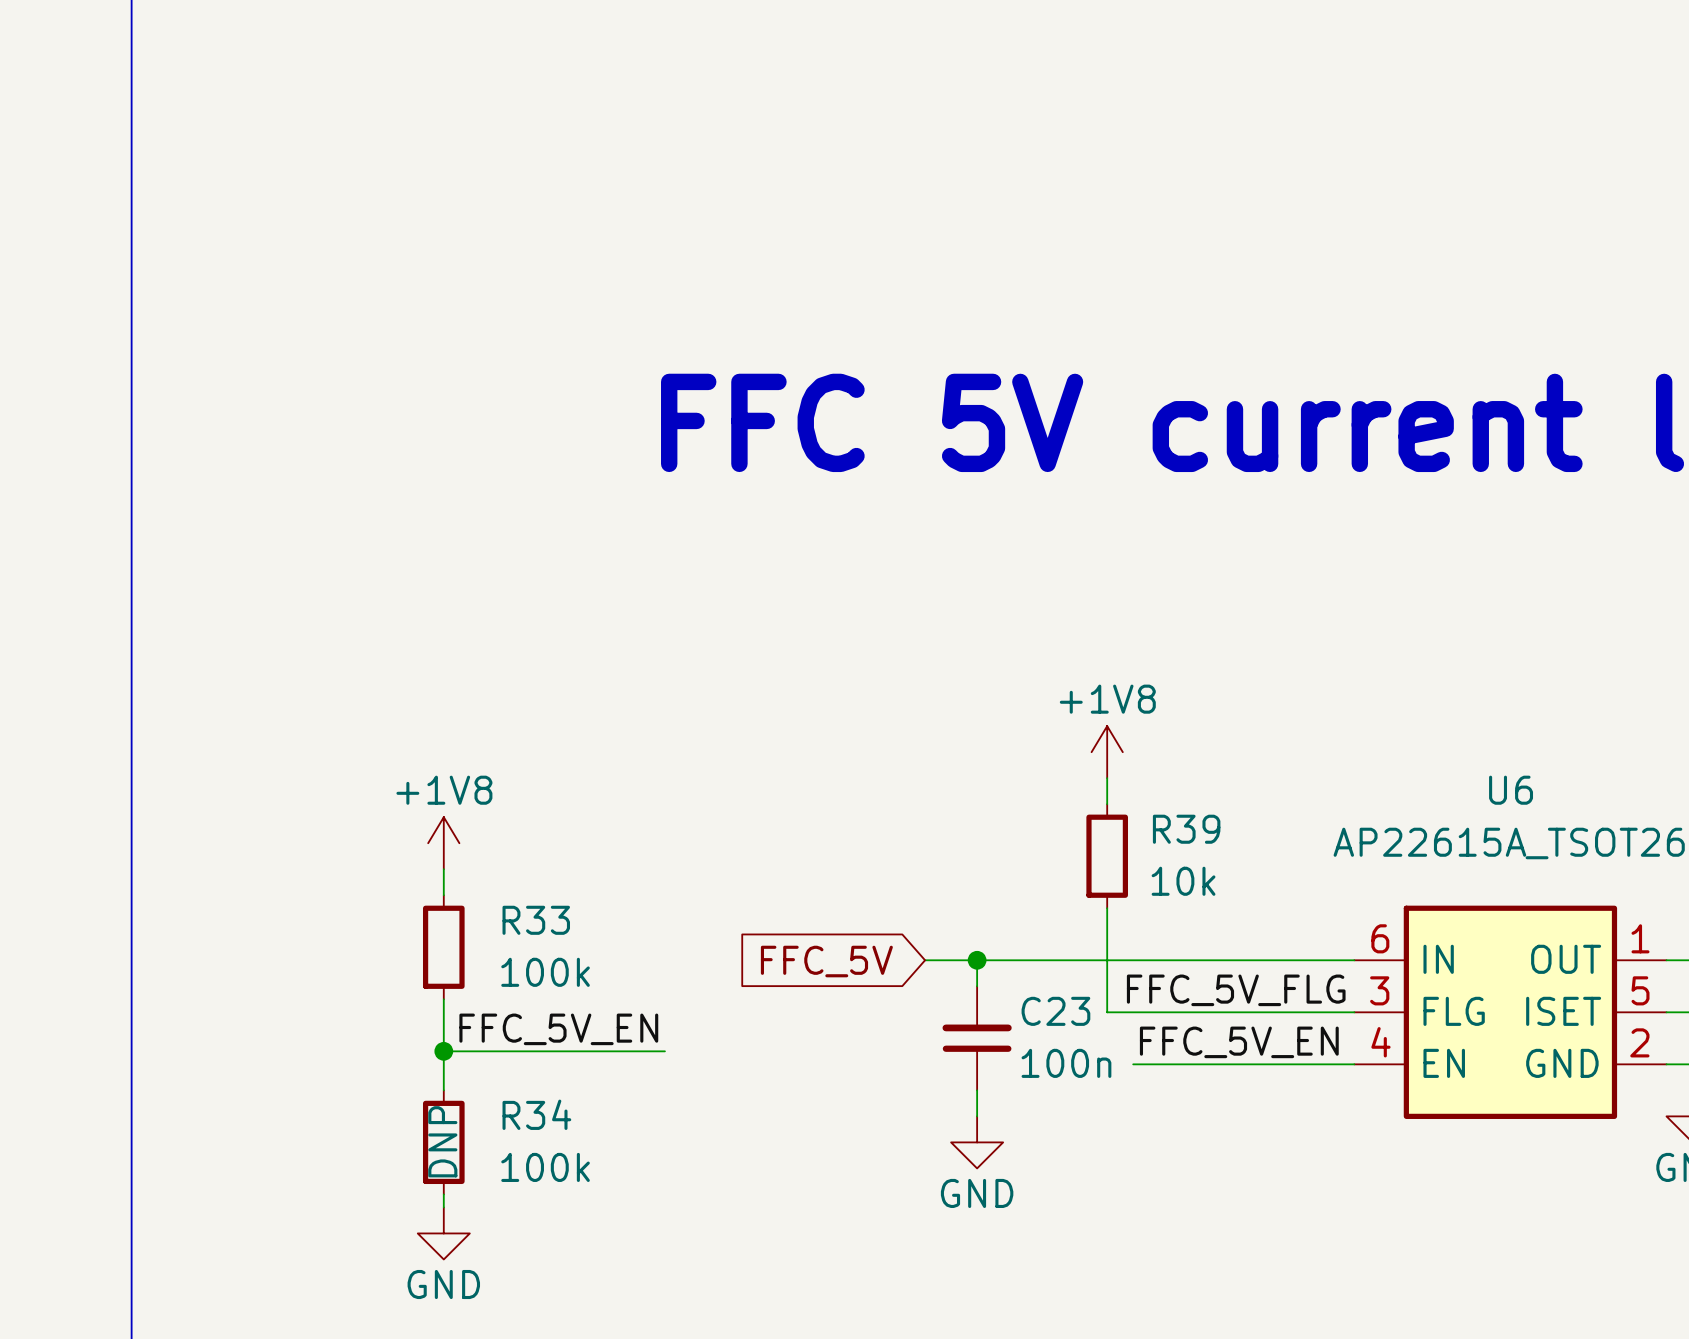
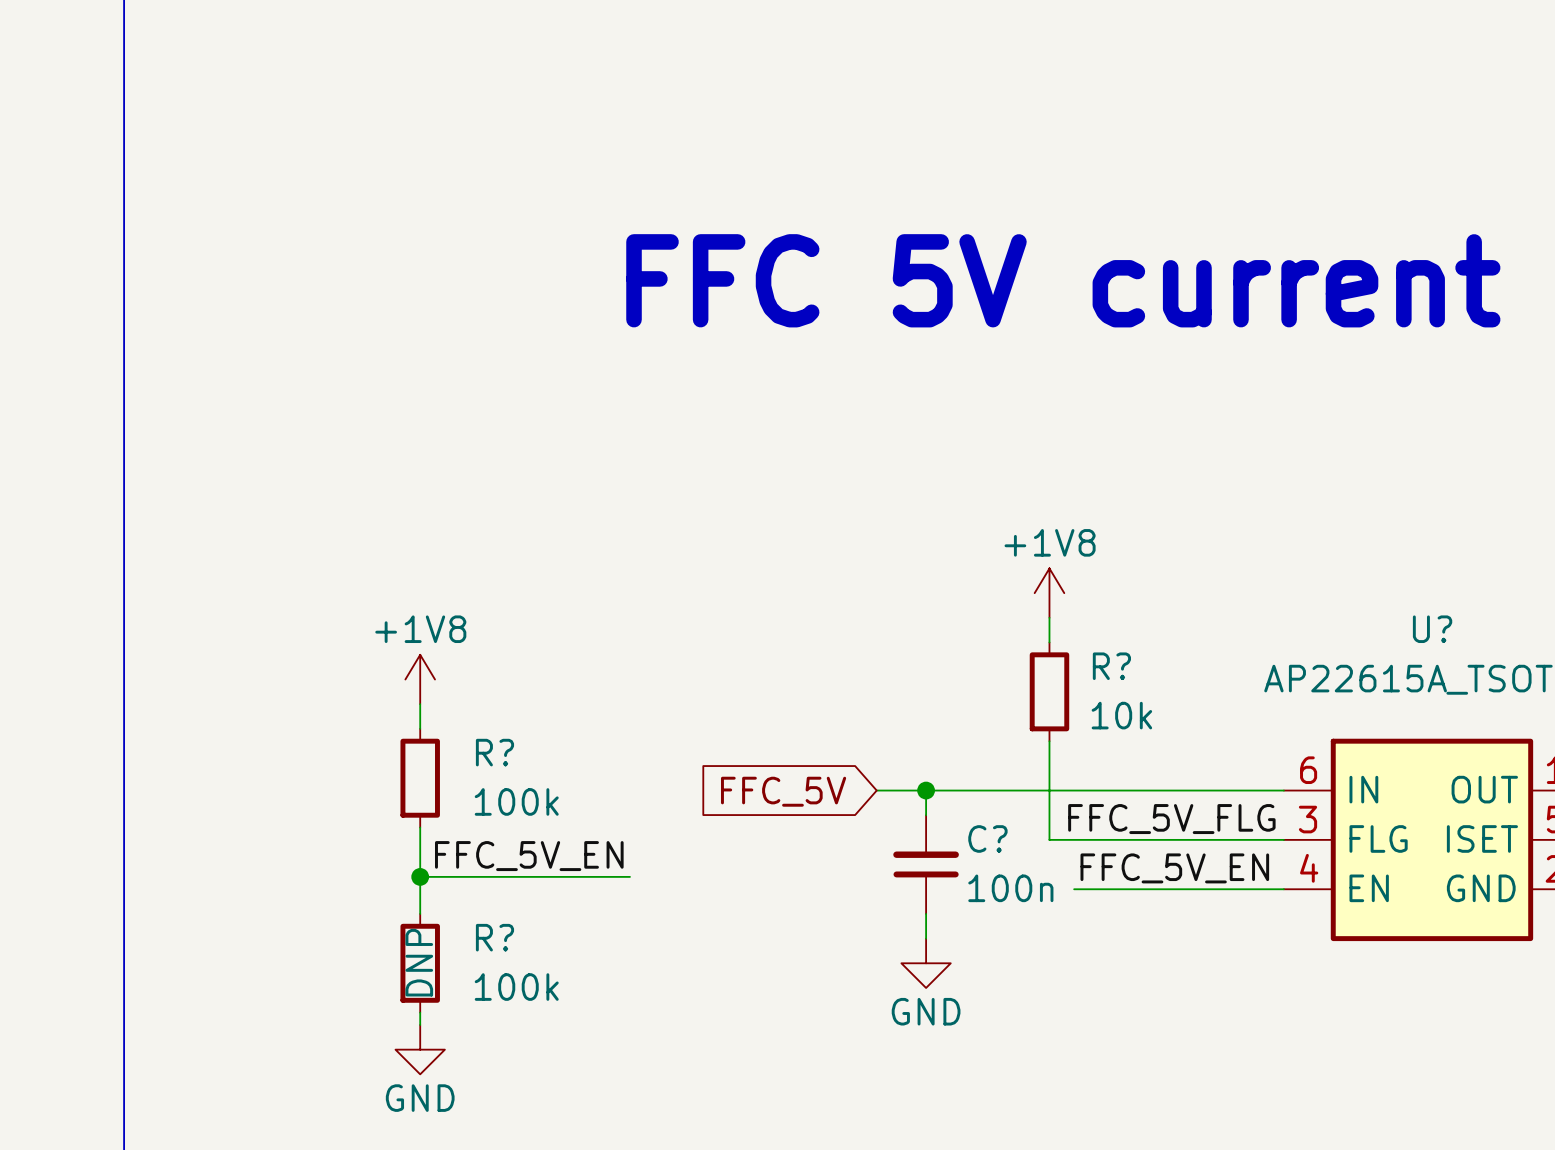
U6 name: U6 (1511, 790) -> U? (1432, 629)
R39 name: R39 (1186, 829) -> R? (1111, 666)
R33 name: R33 (536, 920) -> R? (494, 752)
C23 name: C23 (1055, 1011) -> C? (987, 838)
R34 name: R34 (536, 1114) -> R? (494, 937)

